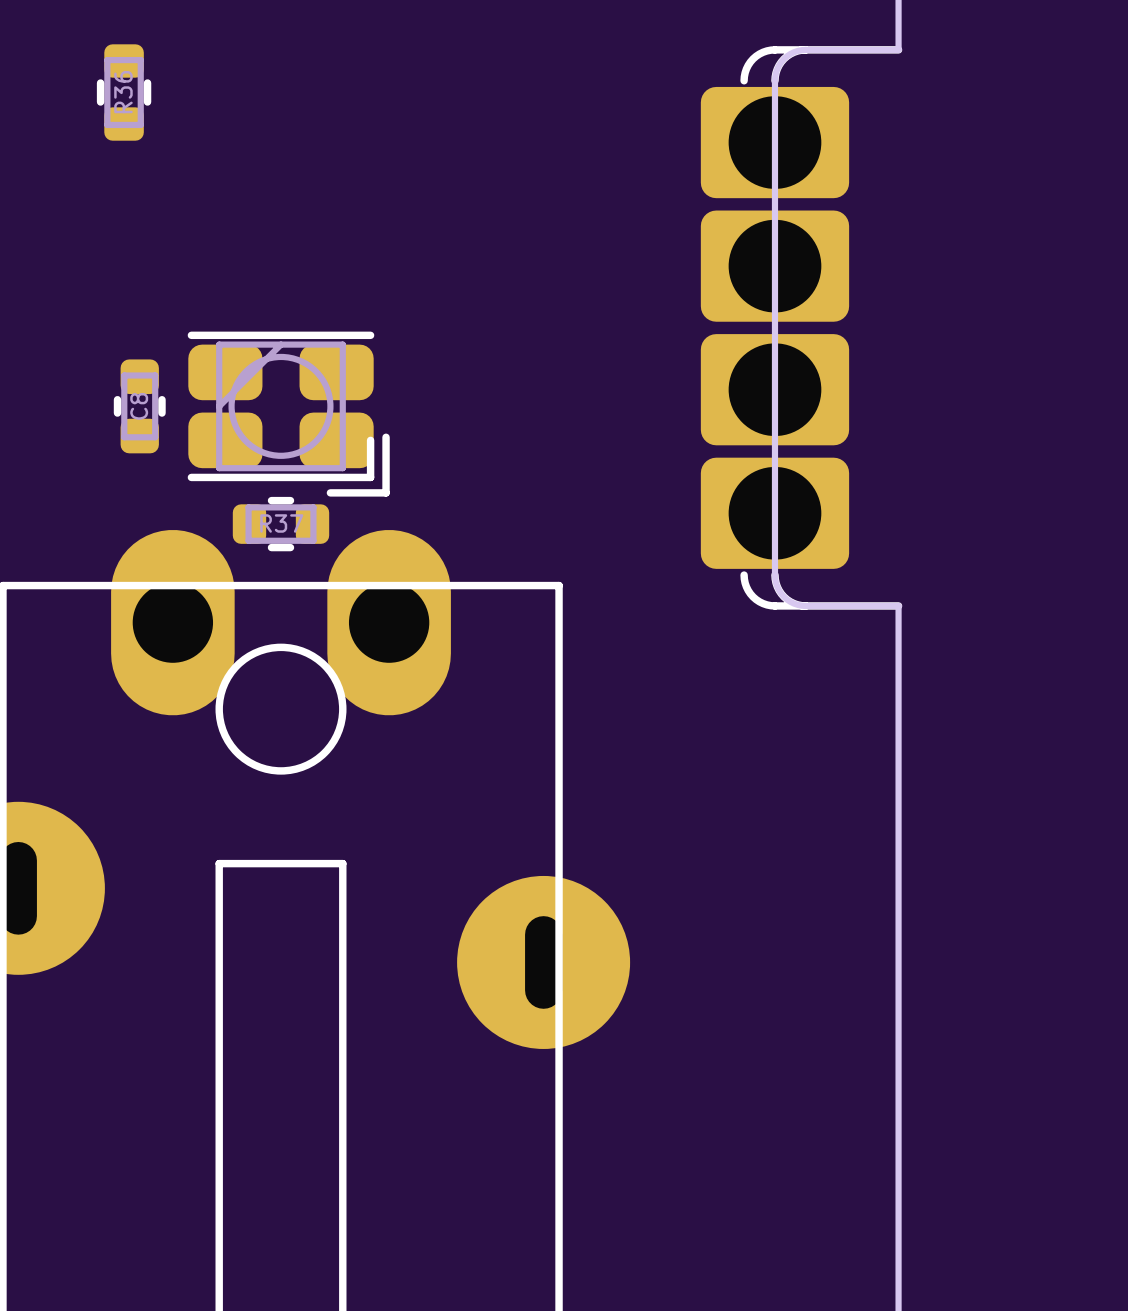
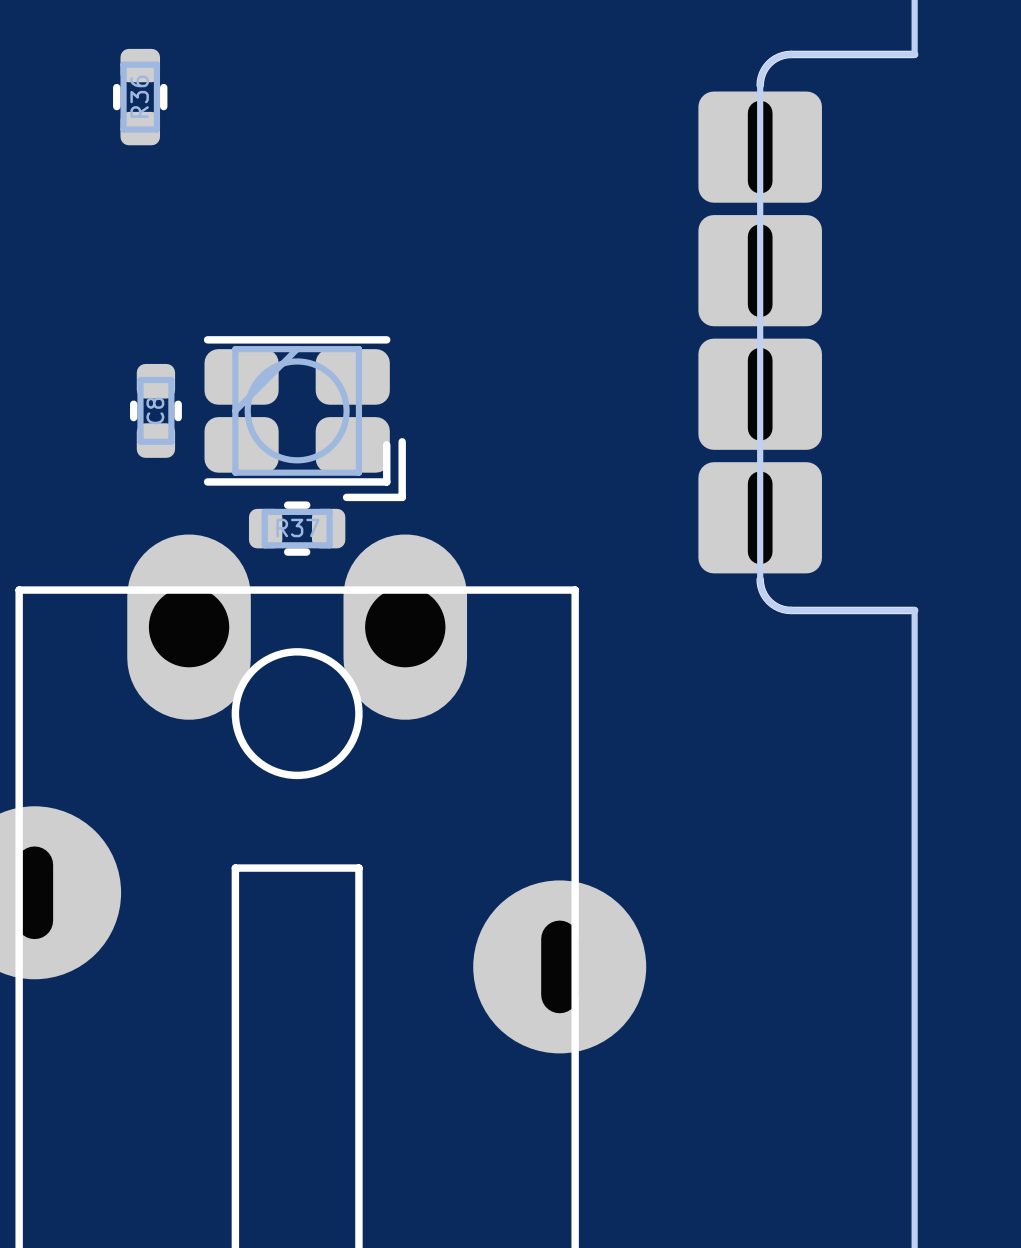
part footprint: [700, 46, 903, 610] -> [698, 50, 919, 615]
board edge: (805, 49) (794, 52) (784, 58) (777, 68) (774, 80) (774, 575) (777, 586) (784, 596) (794, 603) (805, 605) -> (821, 54) (787, 54) (775, 58) (764, 69) (760, 85) (760, 583) (766, 598) (779, 608) (791, 610) (821, 610)

